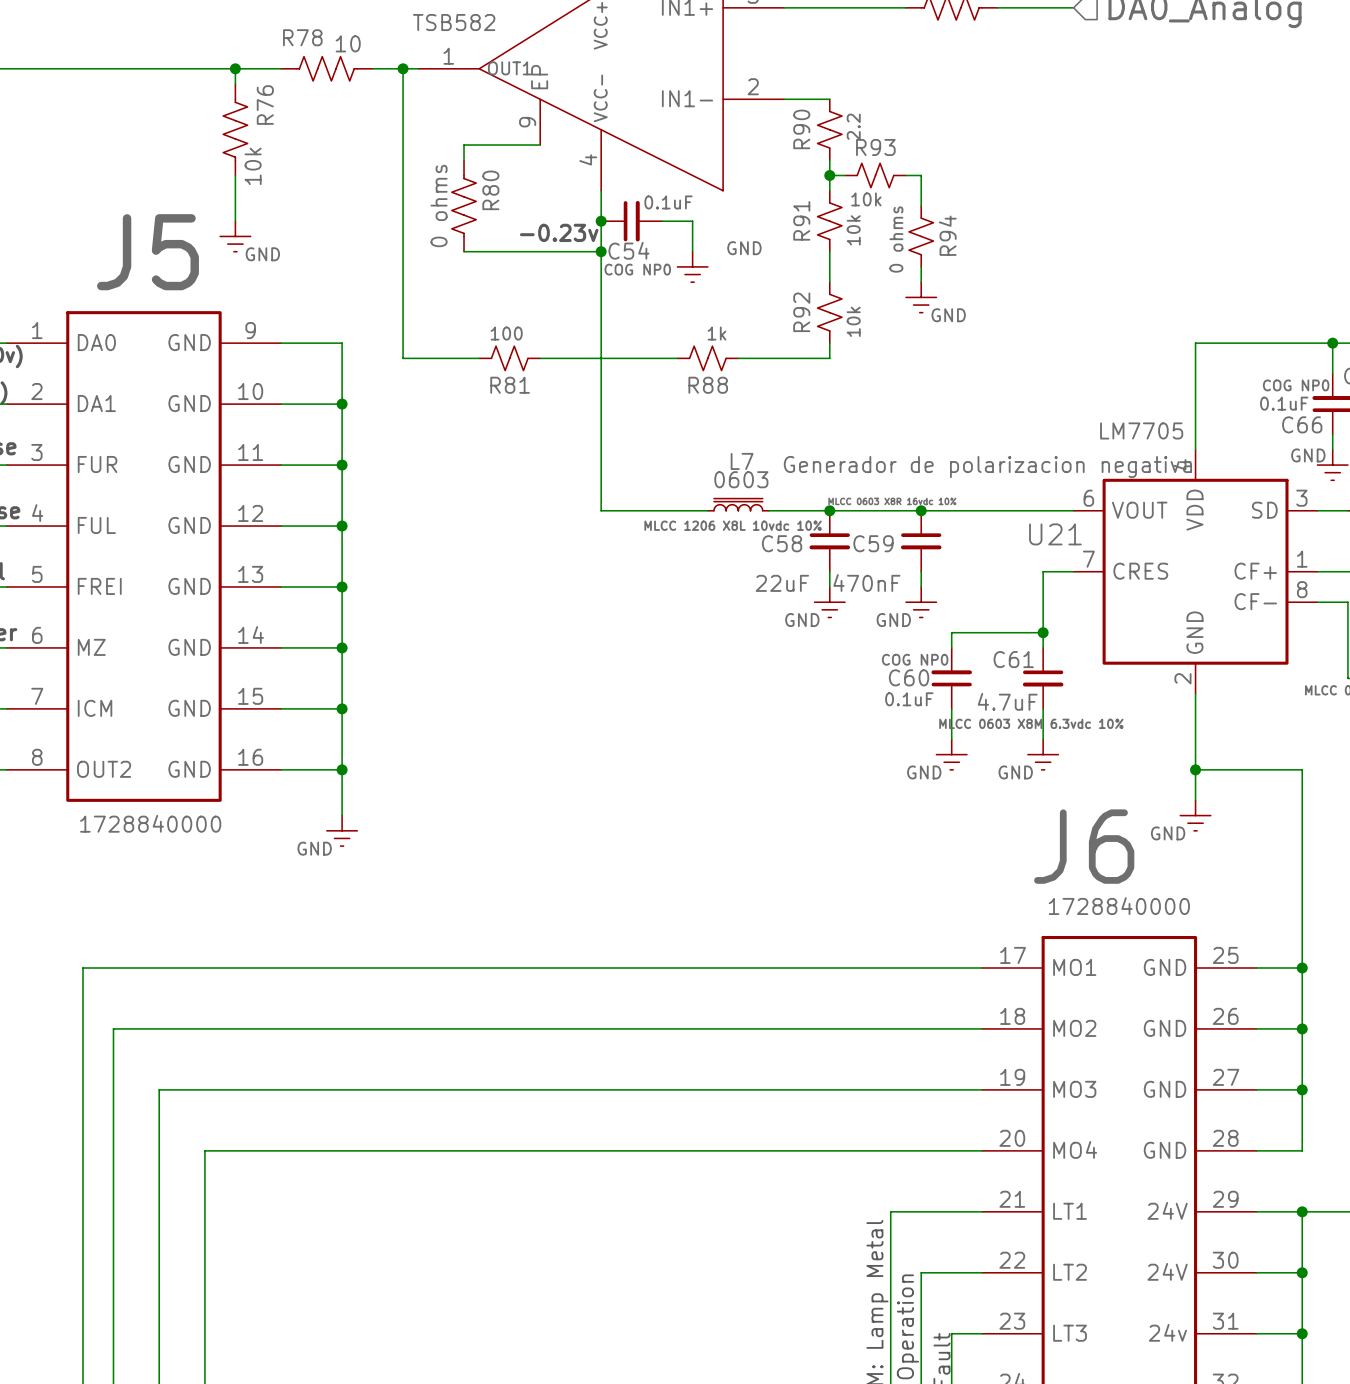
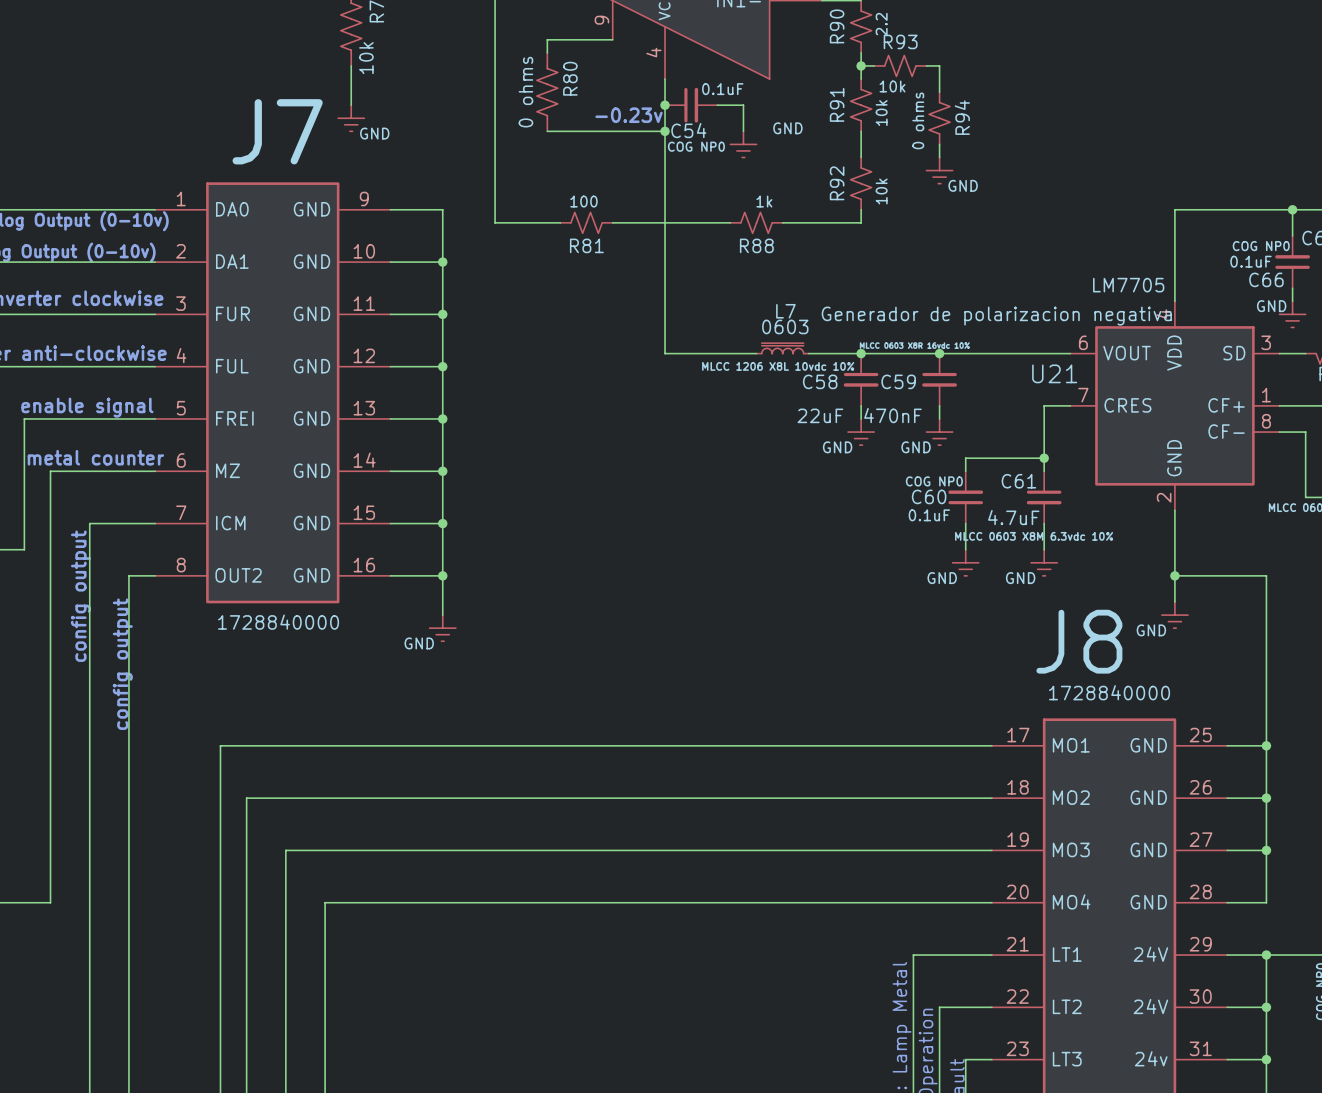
J5 name: J5 (148, 252) -> J7 (277, 131)
J6 name: J6 (1084, 846) -> J8 (1079, 641)

